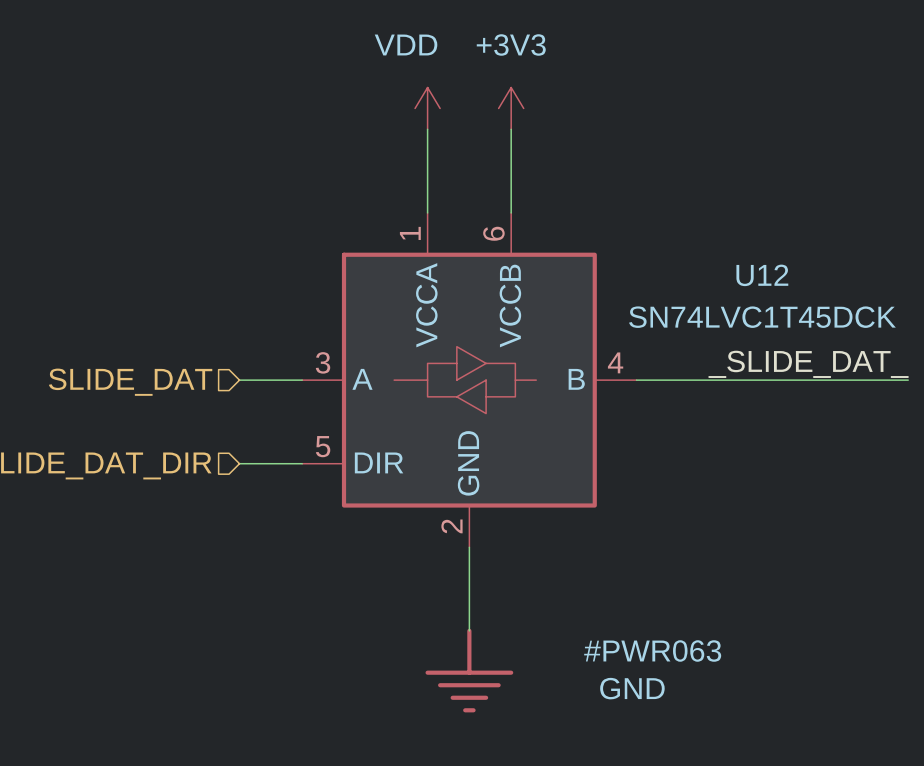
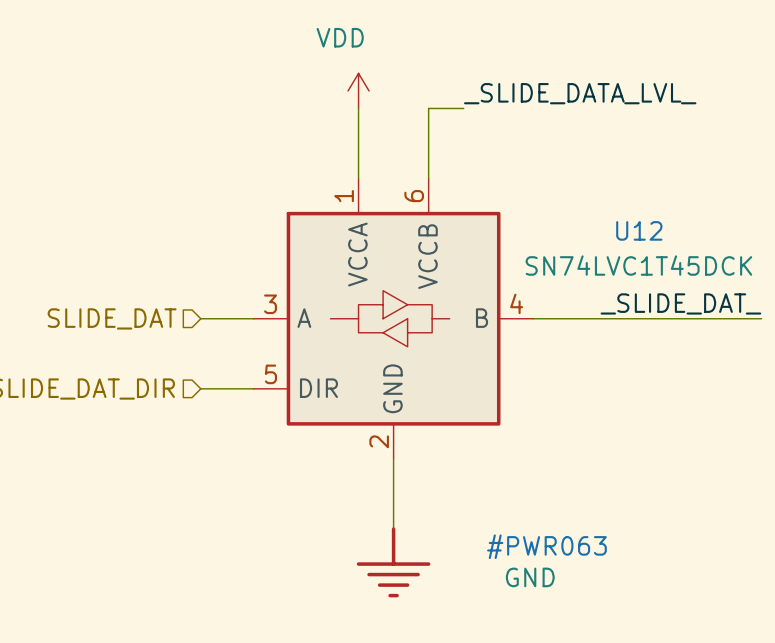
power symbol: +3V3 (511, 108) -> none
label: none -> _SLIDE_DATA_LVL_ (580, 93)
wire: none -> (428, 108) (463, 108)

